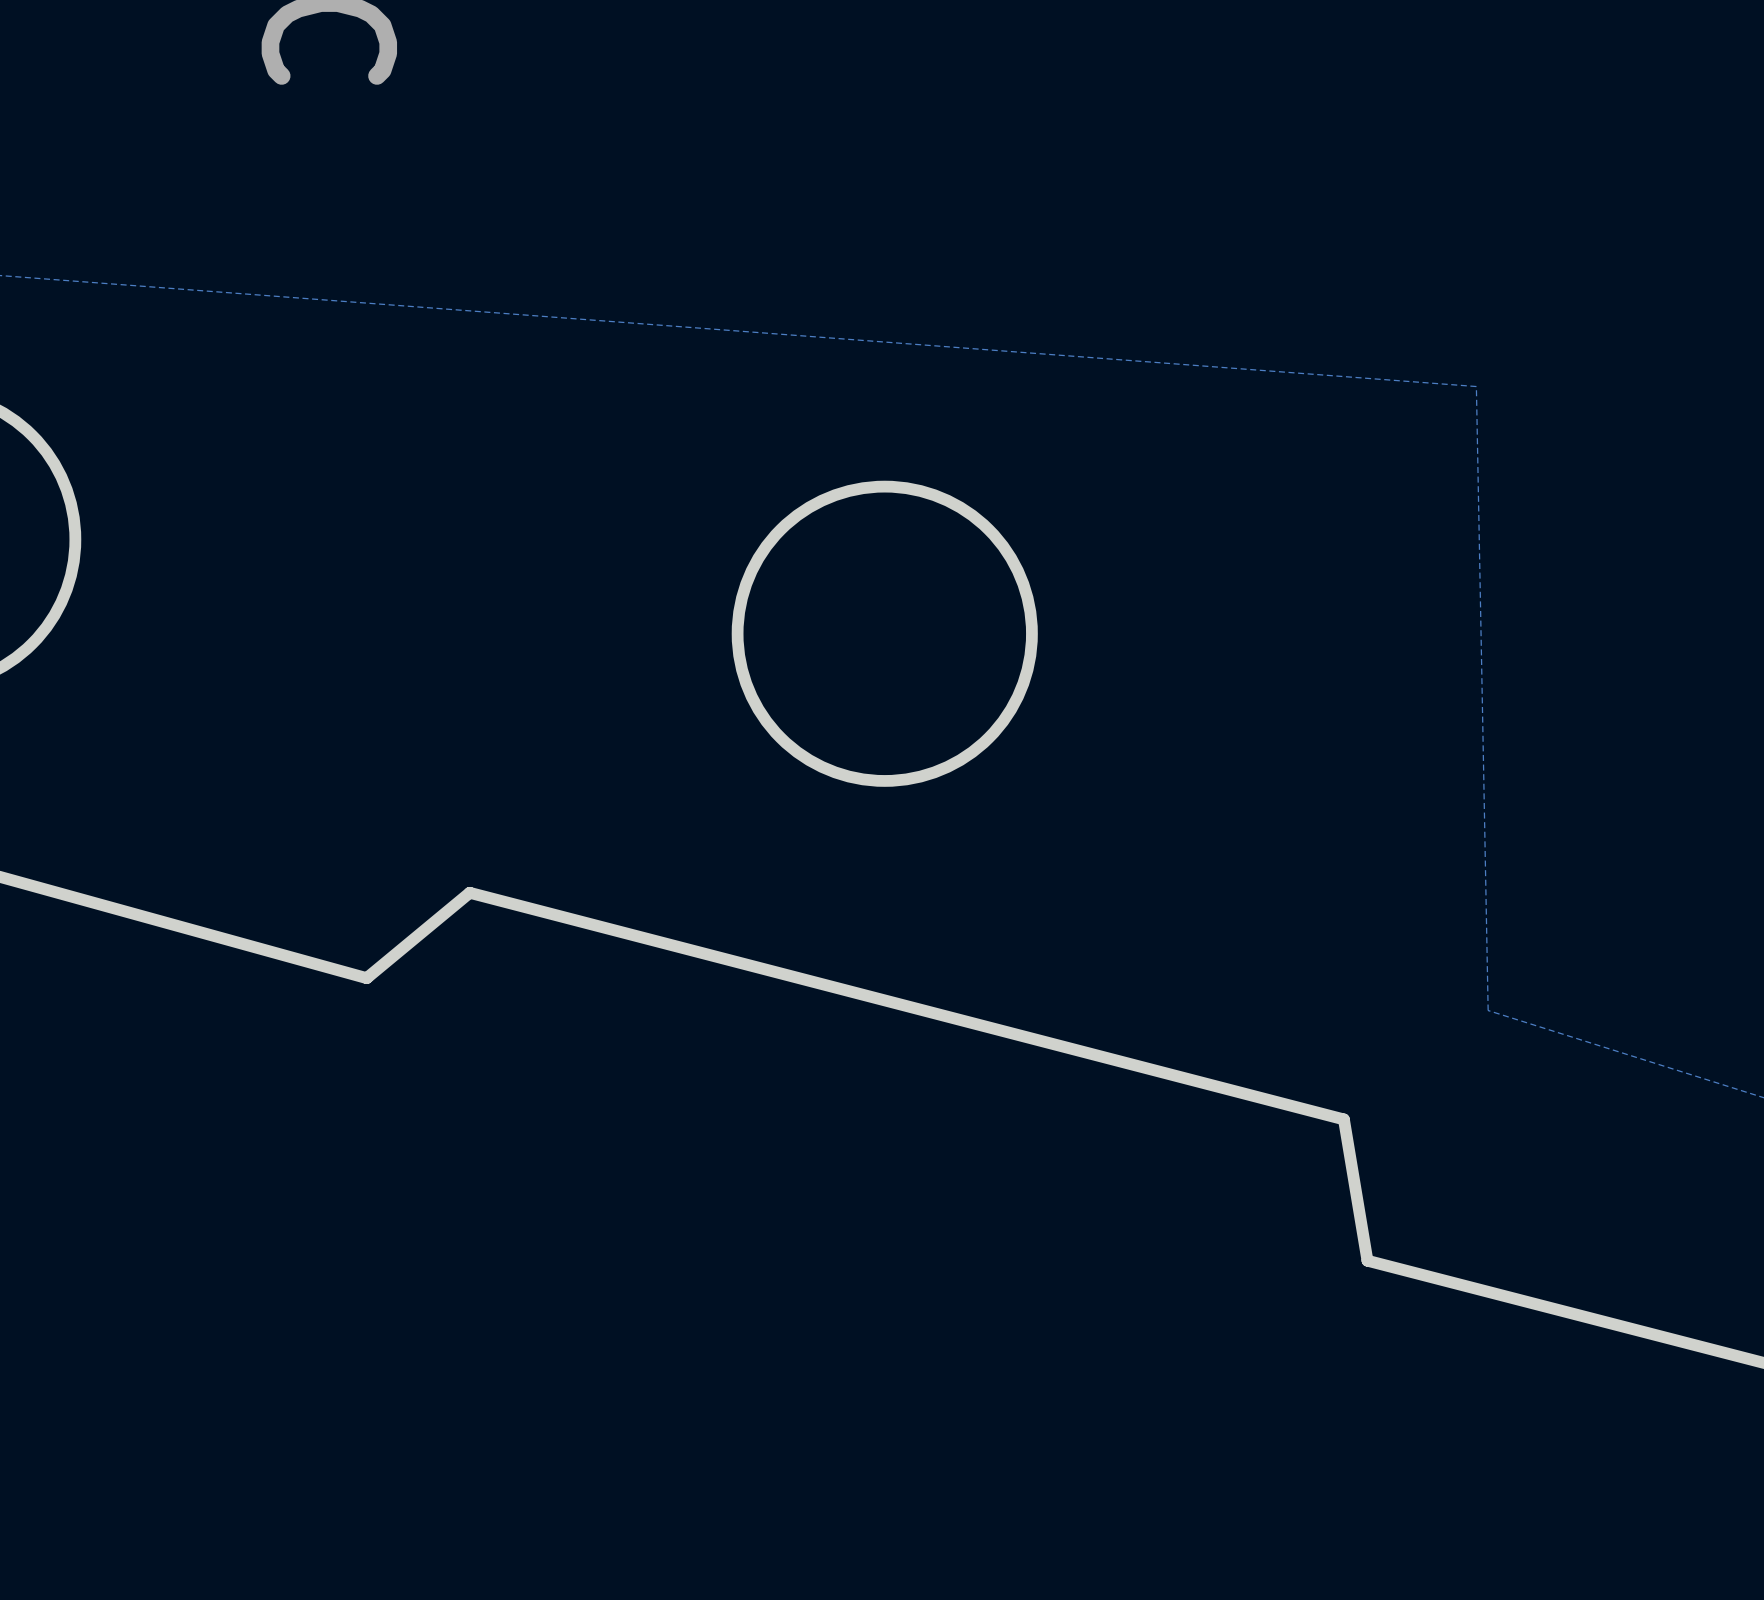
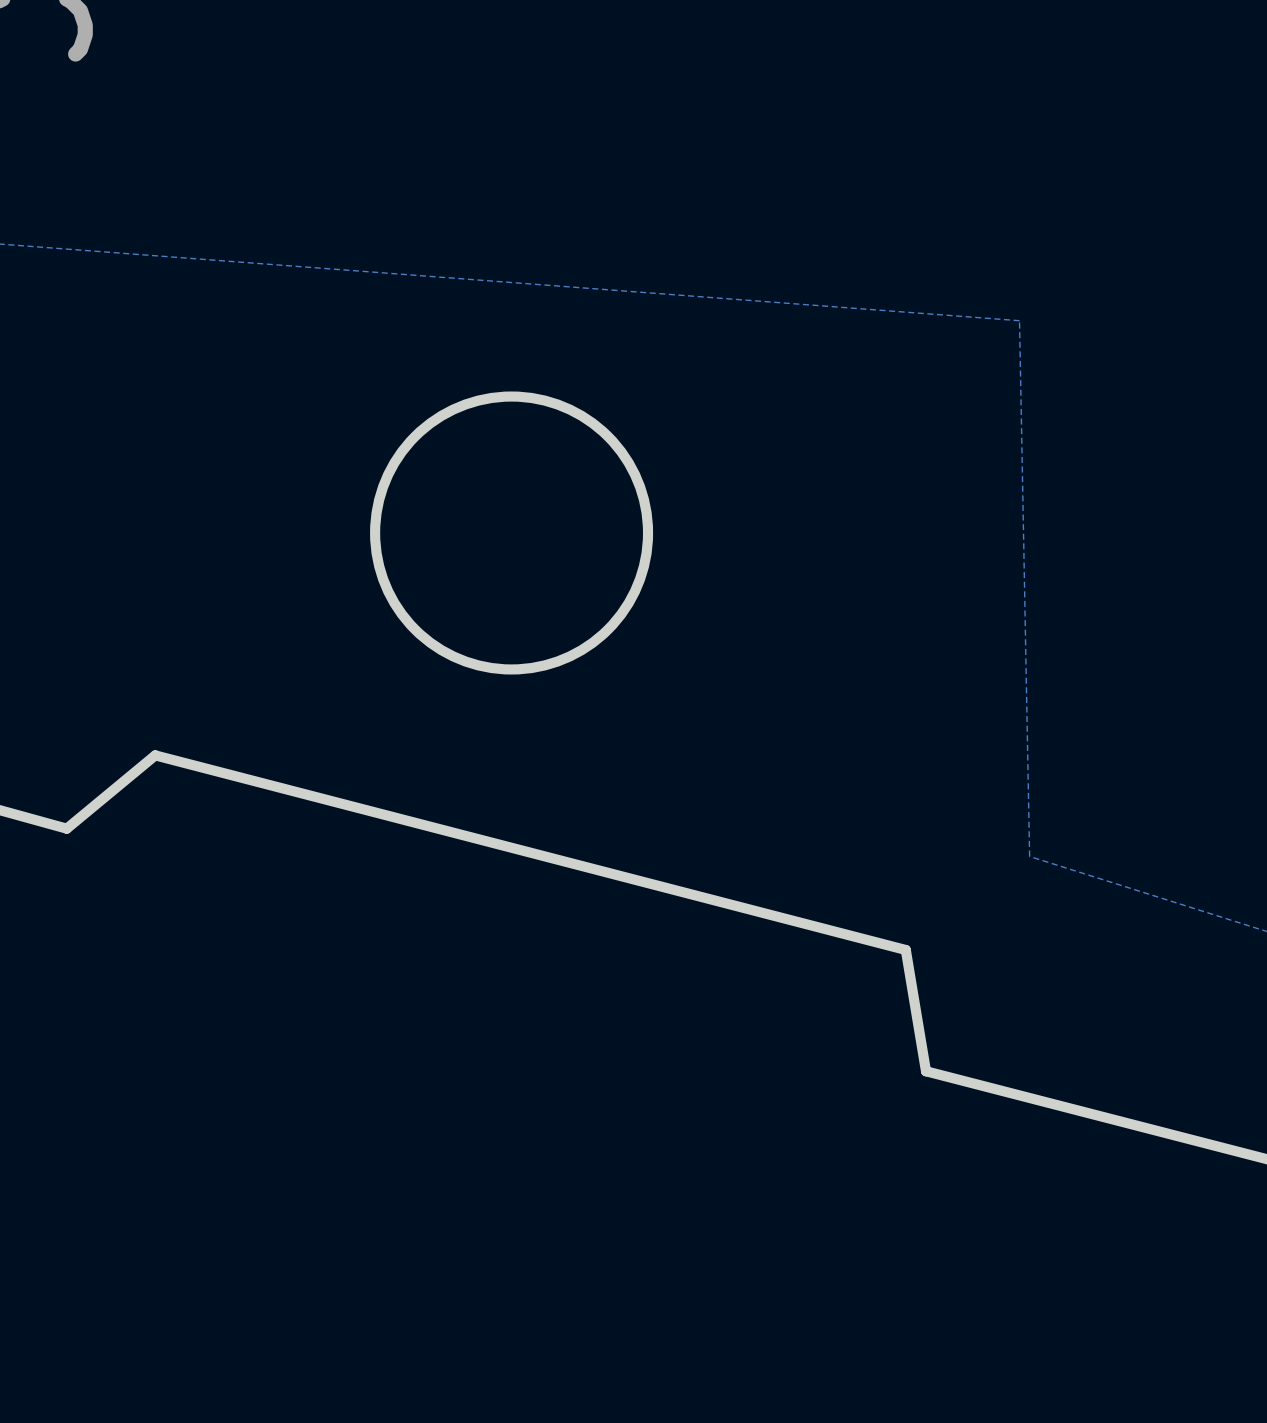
round board edge size: [731, 480, 1038, 787] -> [370, 391, 654, 675]

